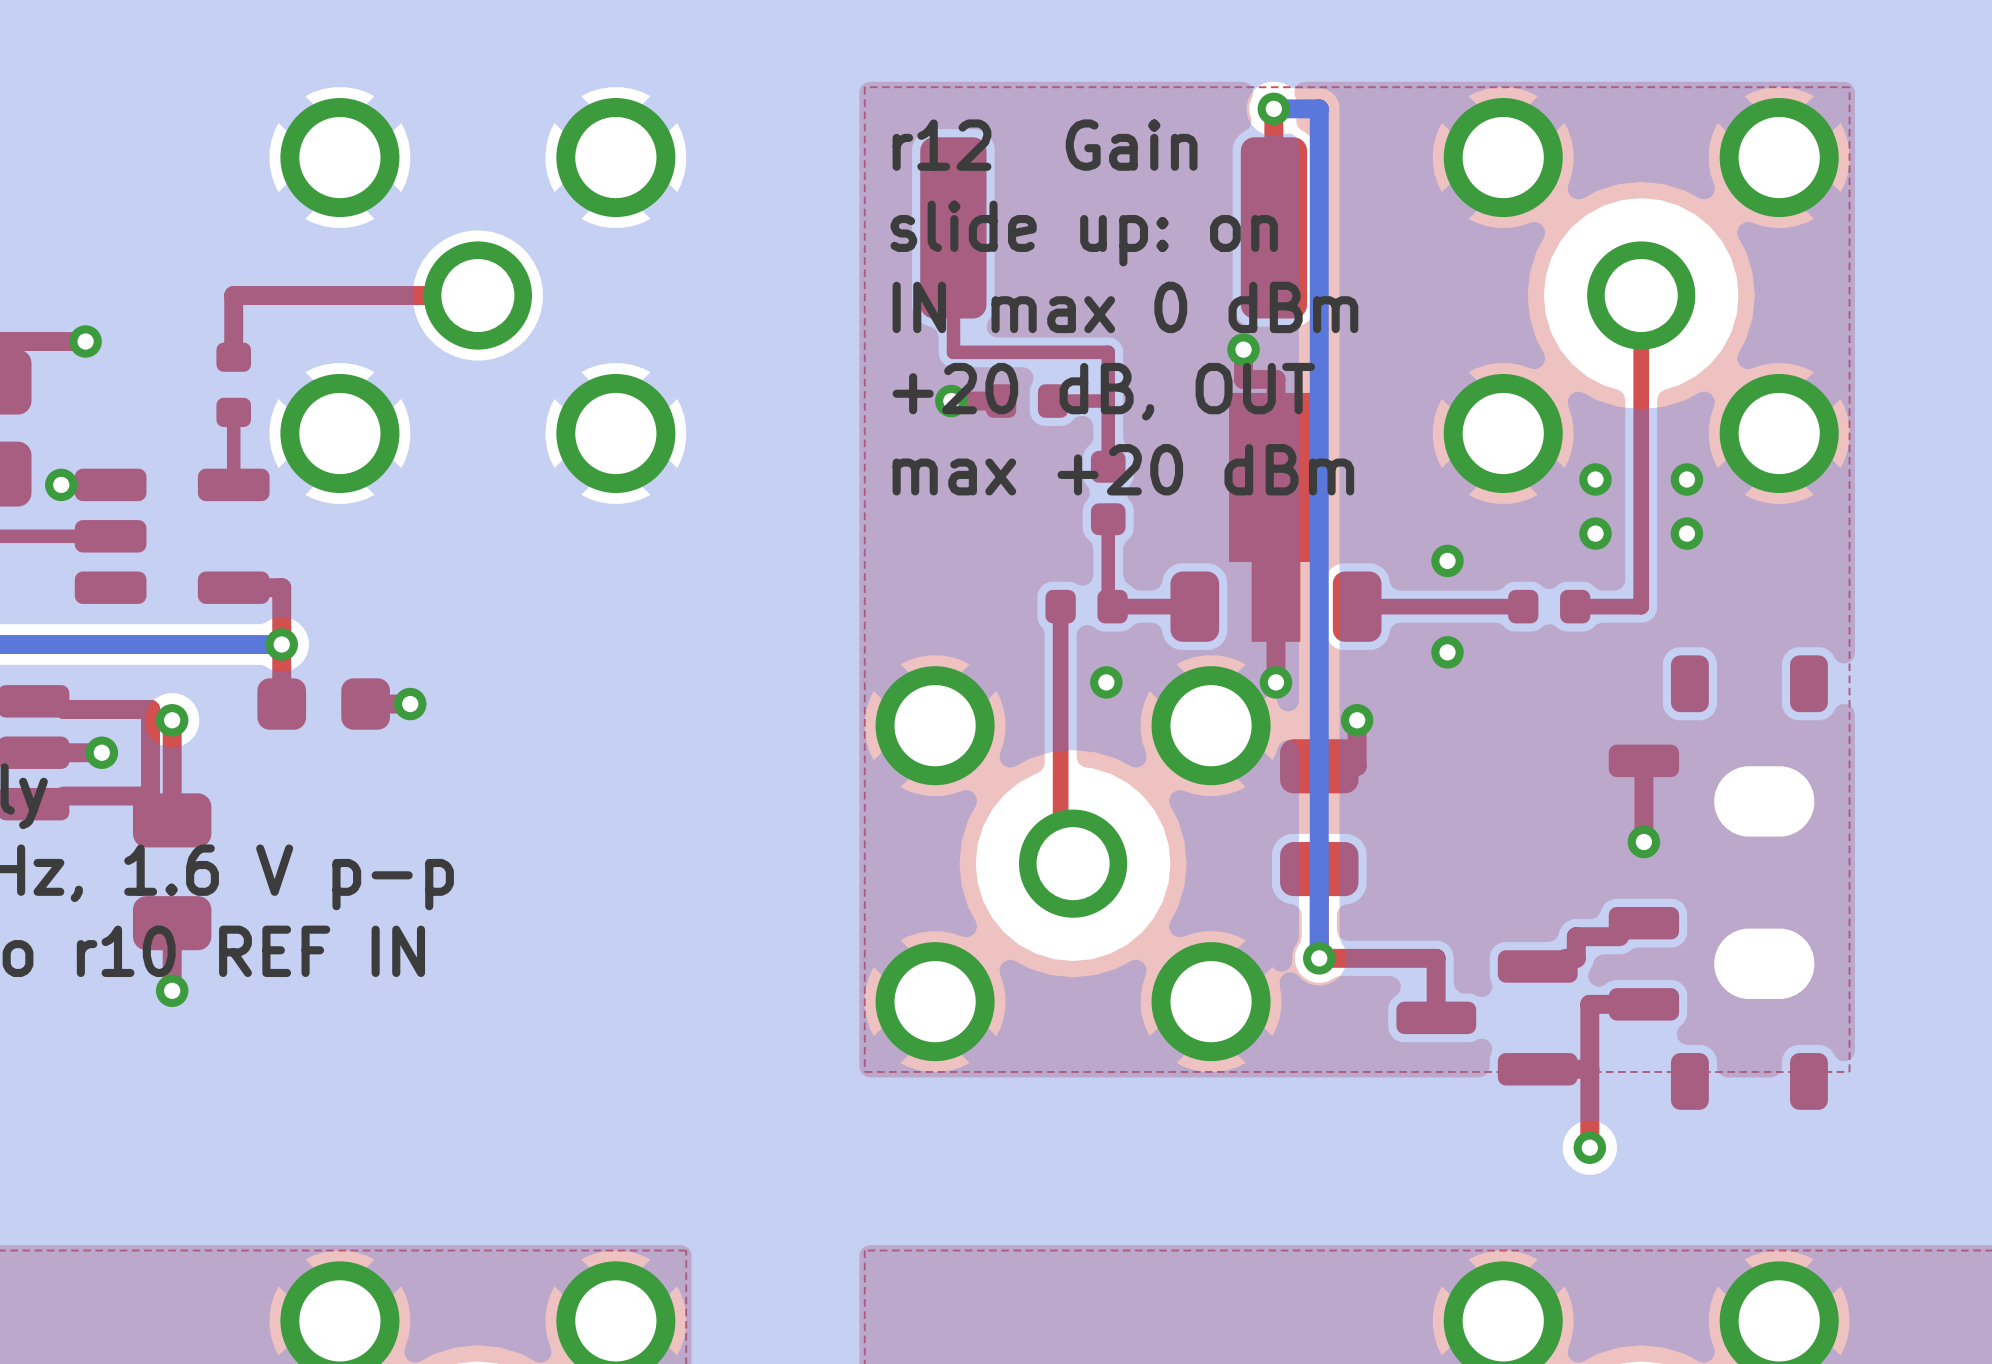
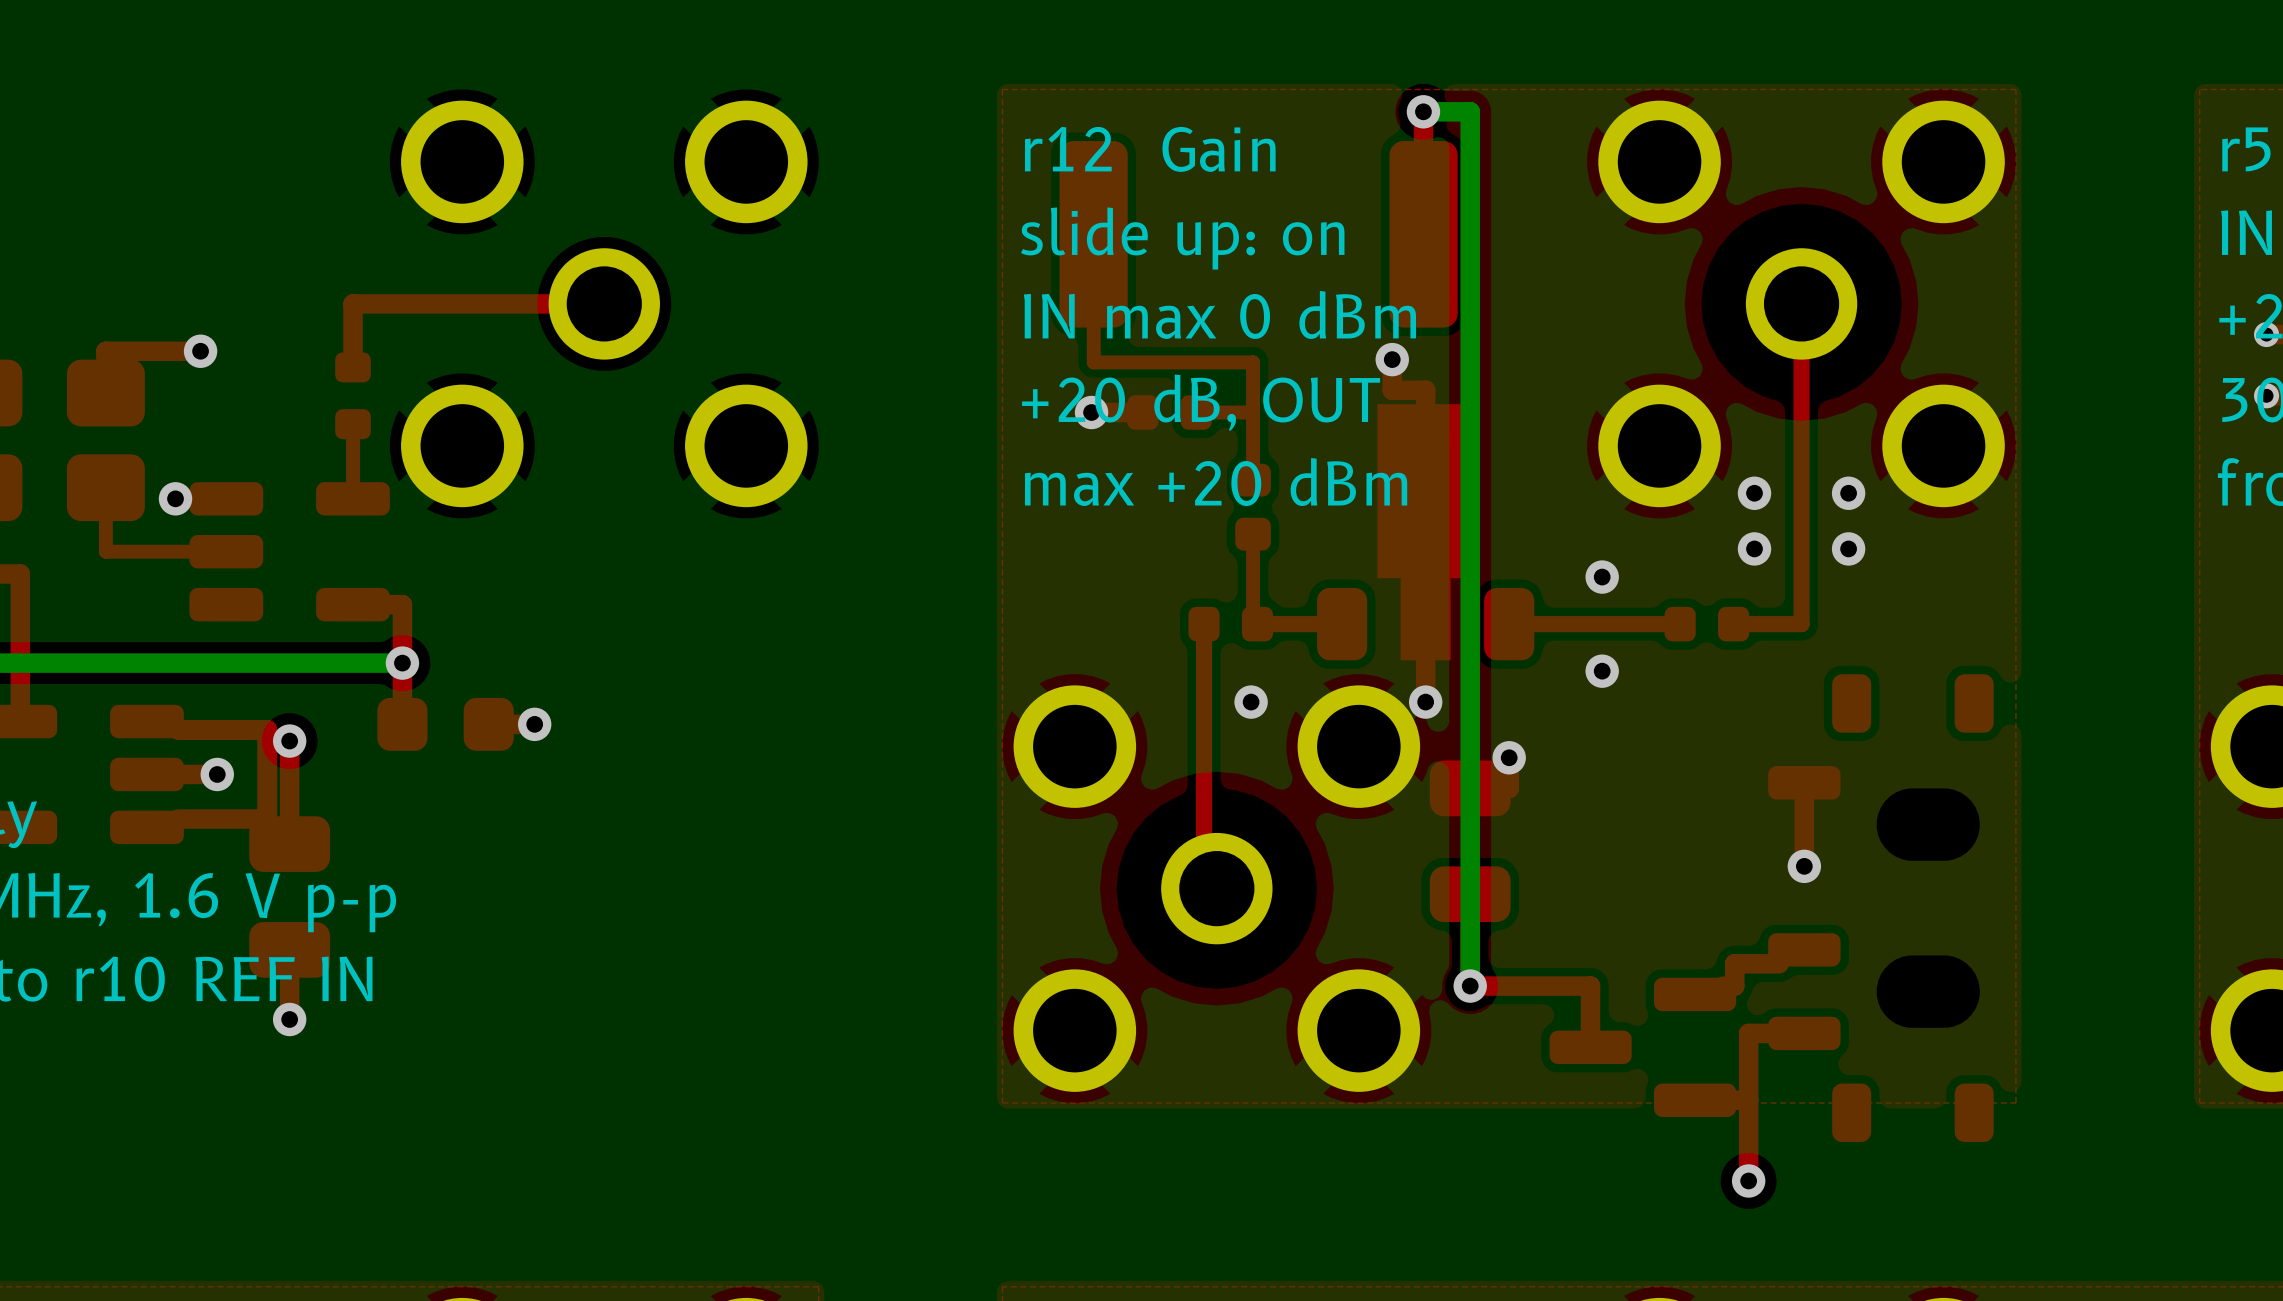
via position: (1357, 720) -> (1509, 757)

